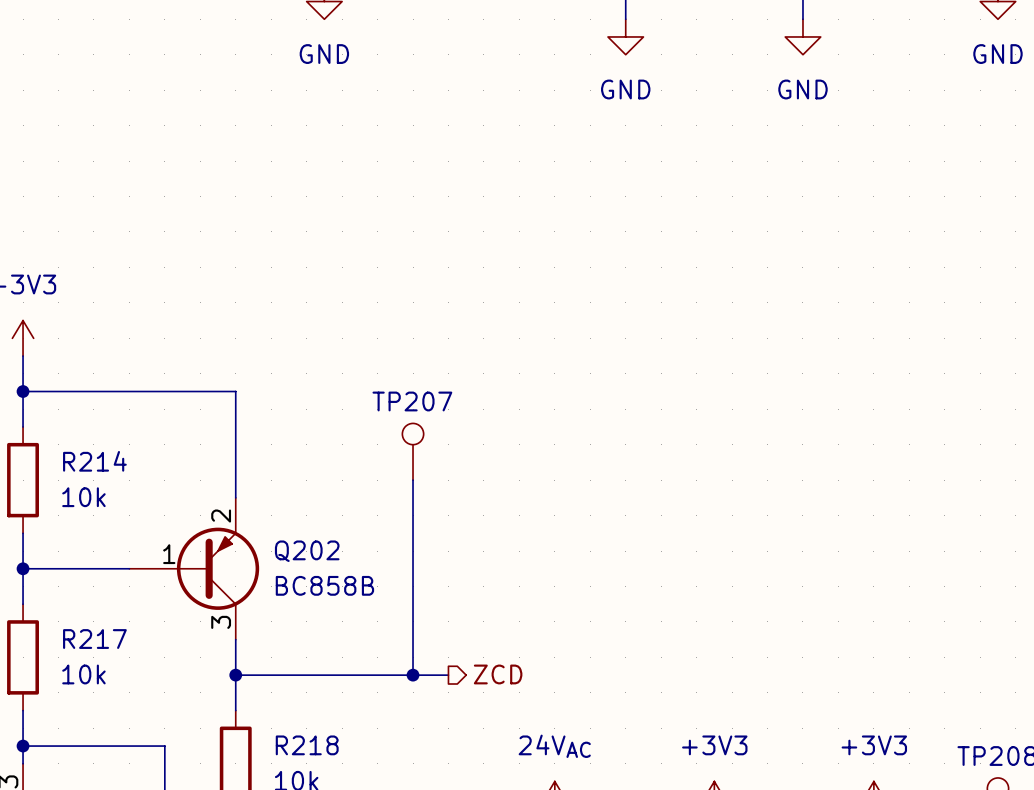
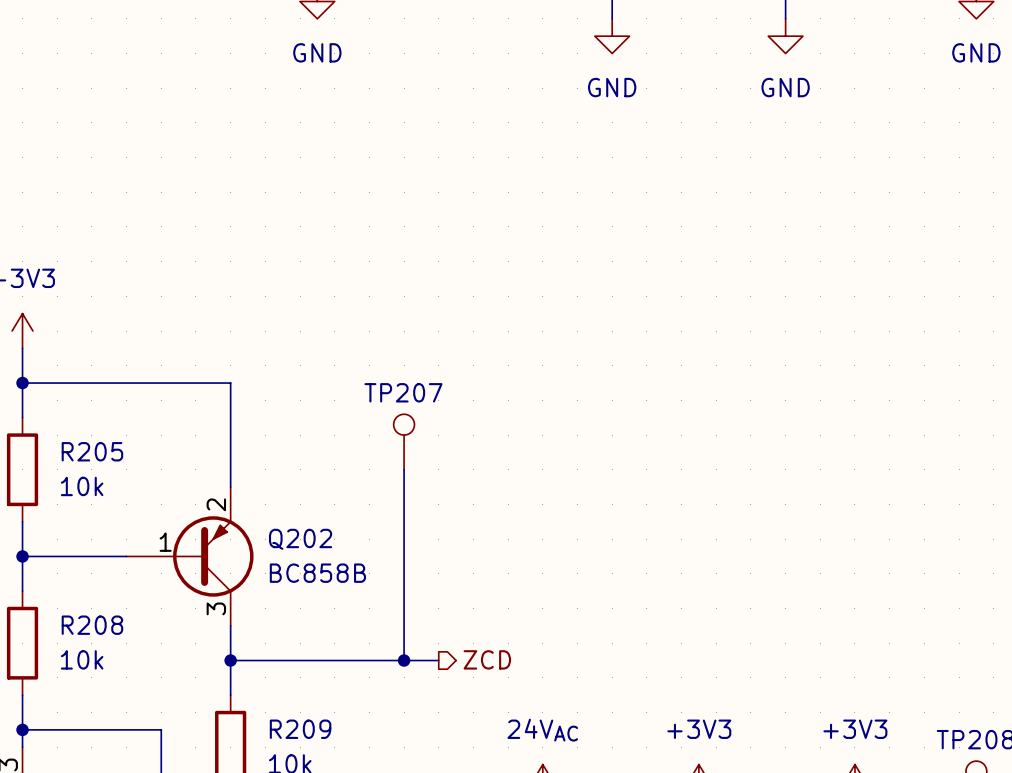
R214 name: R214 (94, 461) -> R205 (92, 451)
R217 name: R217 (94, 639) -> R208 (92, 625)
R218 name: R218 (307, 745) -> R209 (300, 729)

